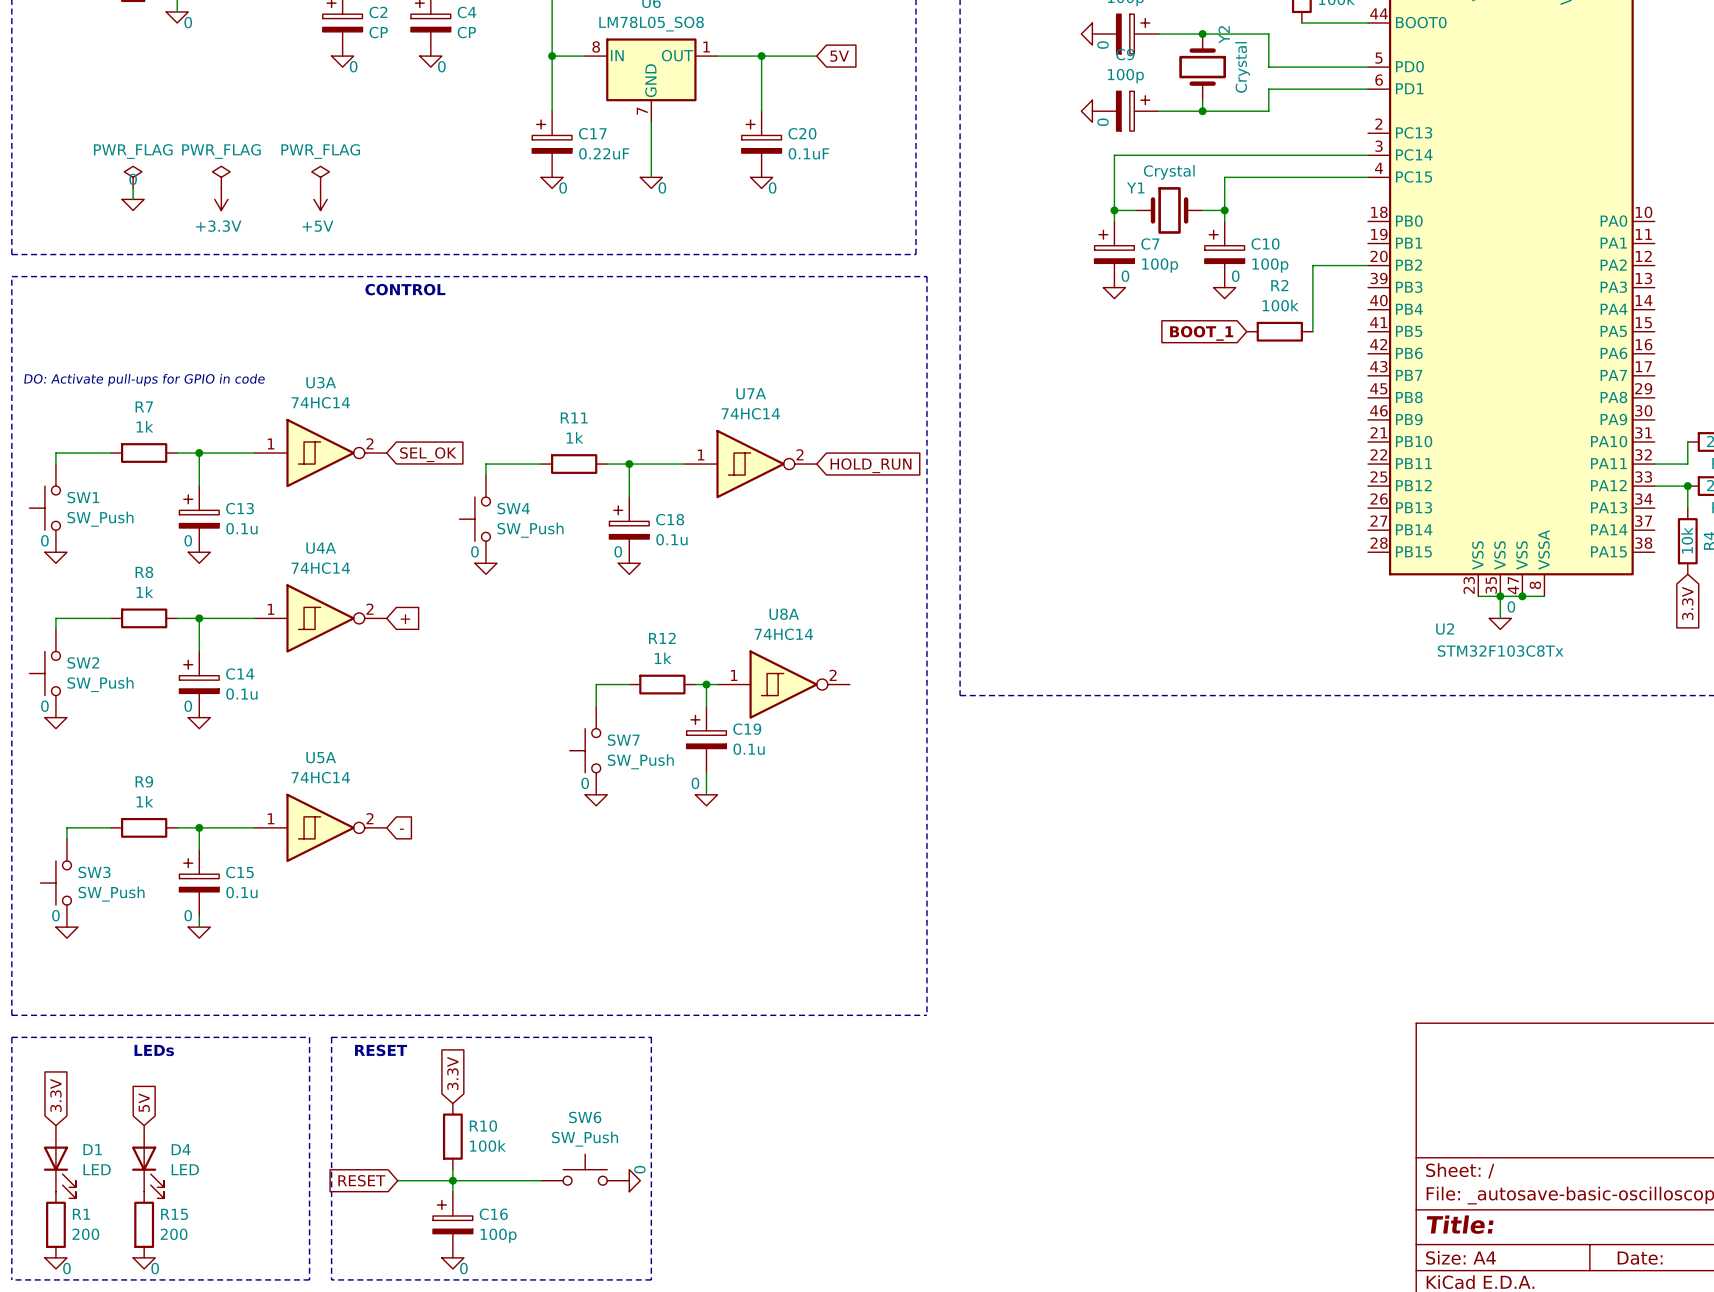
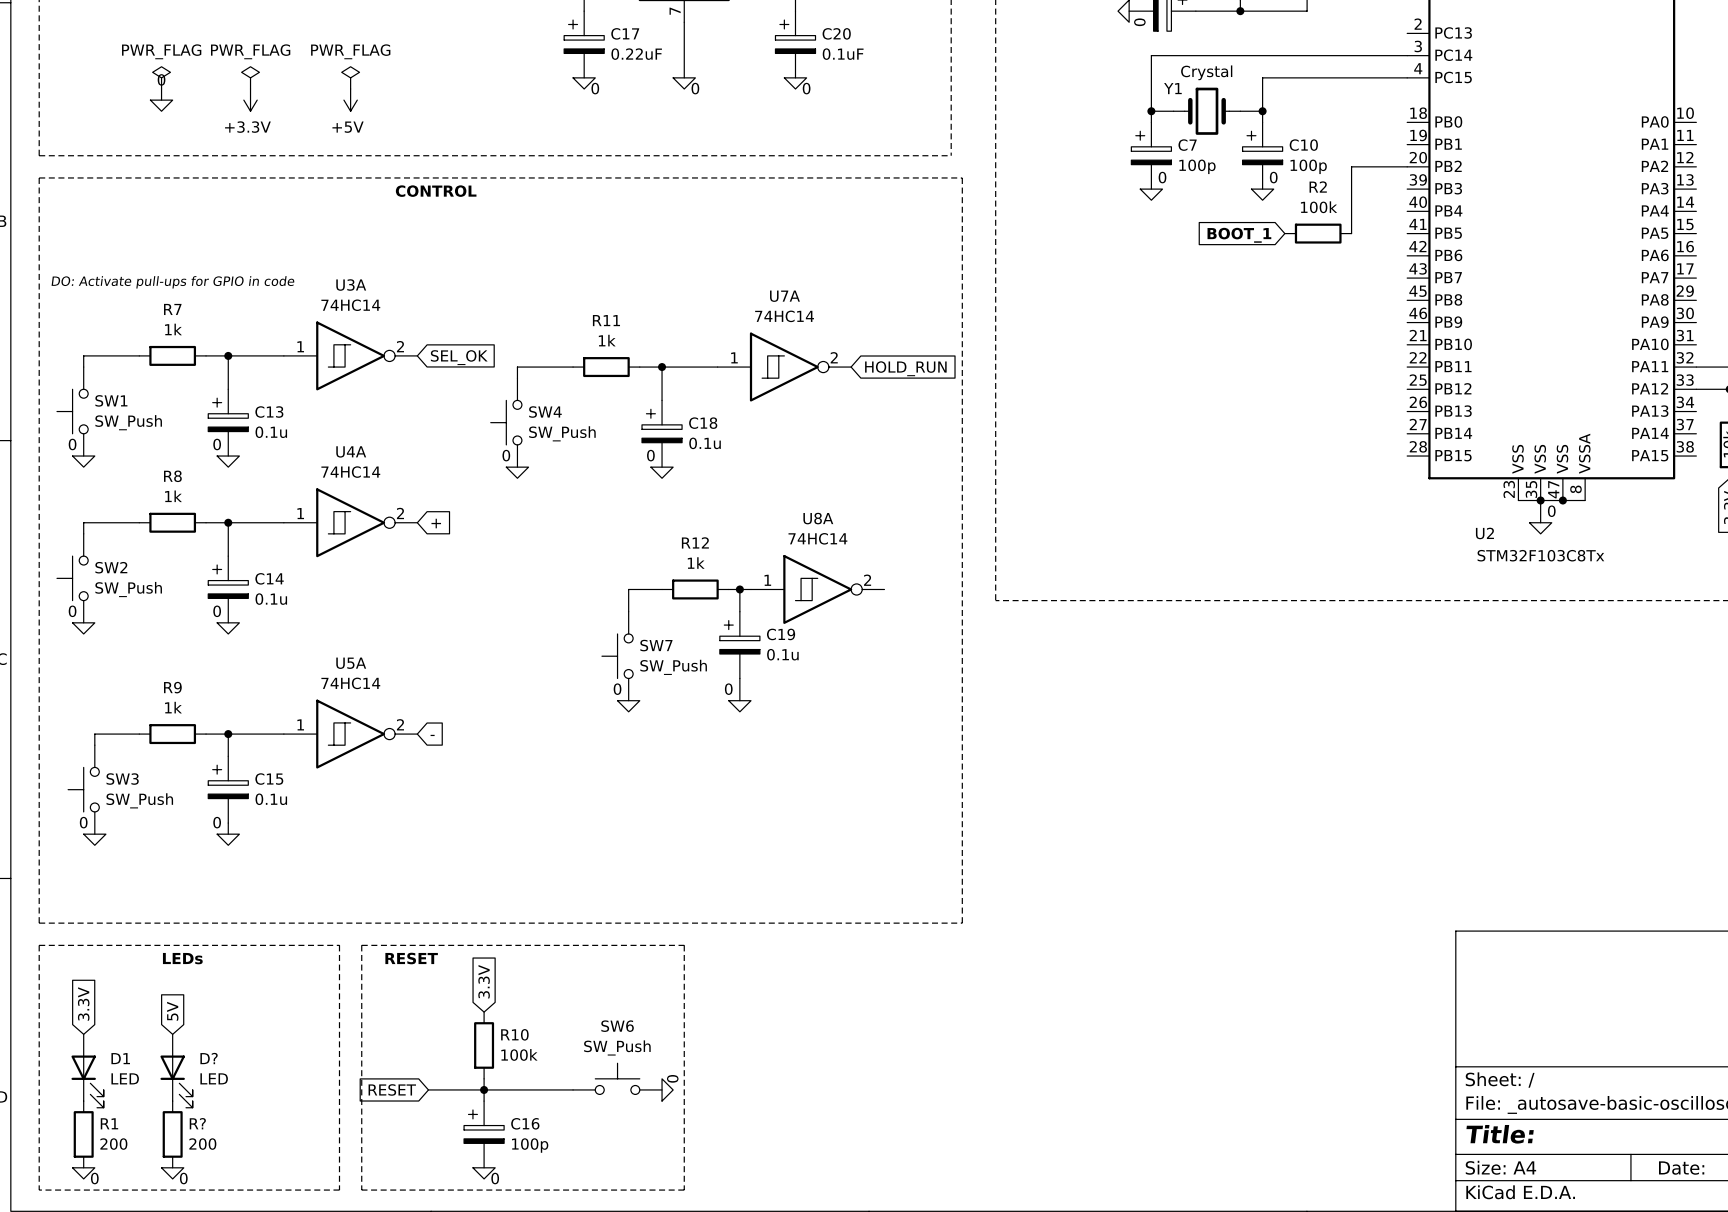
D4 name: D4 (181, 1149) -> D? (209, 1058)
R15 name: R15 (174, 1214) -> R? (197, 1123)

